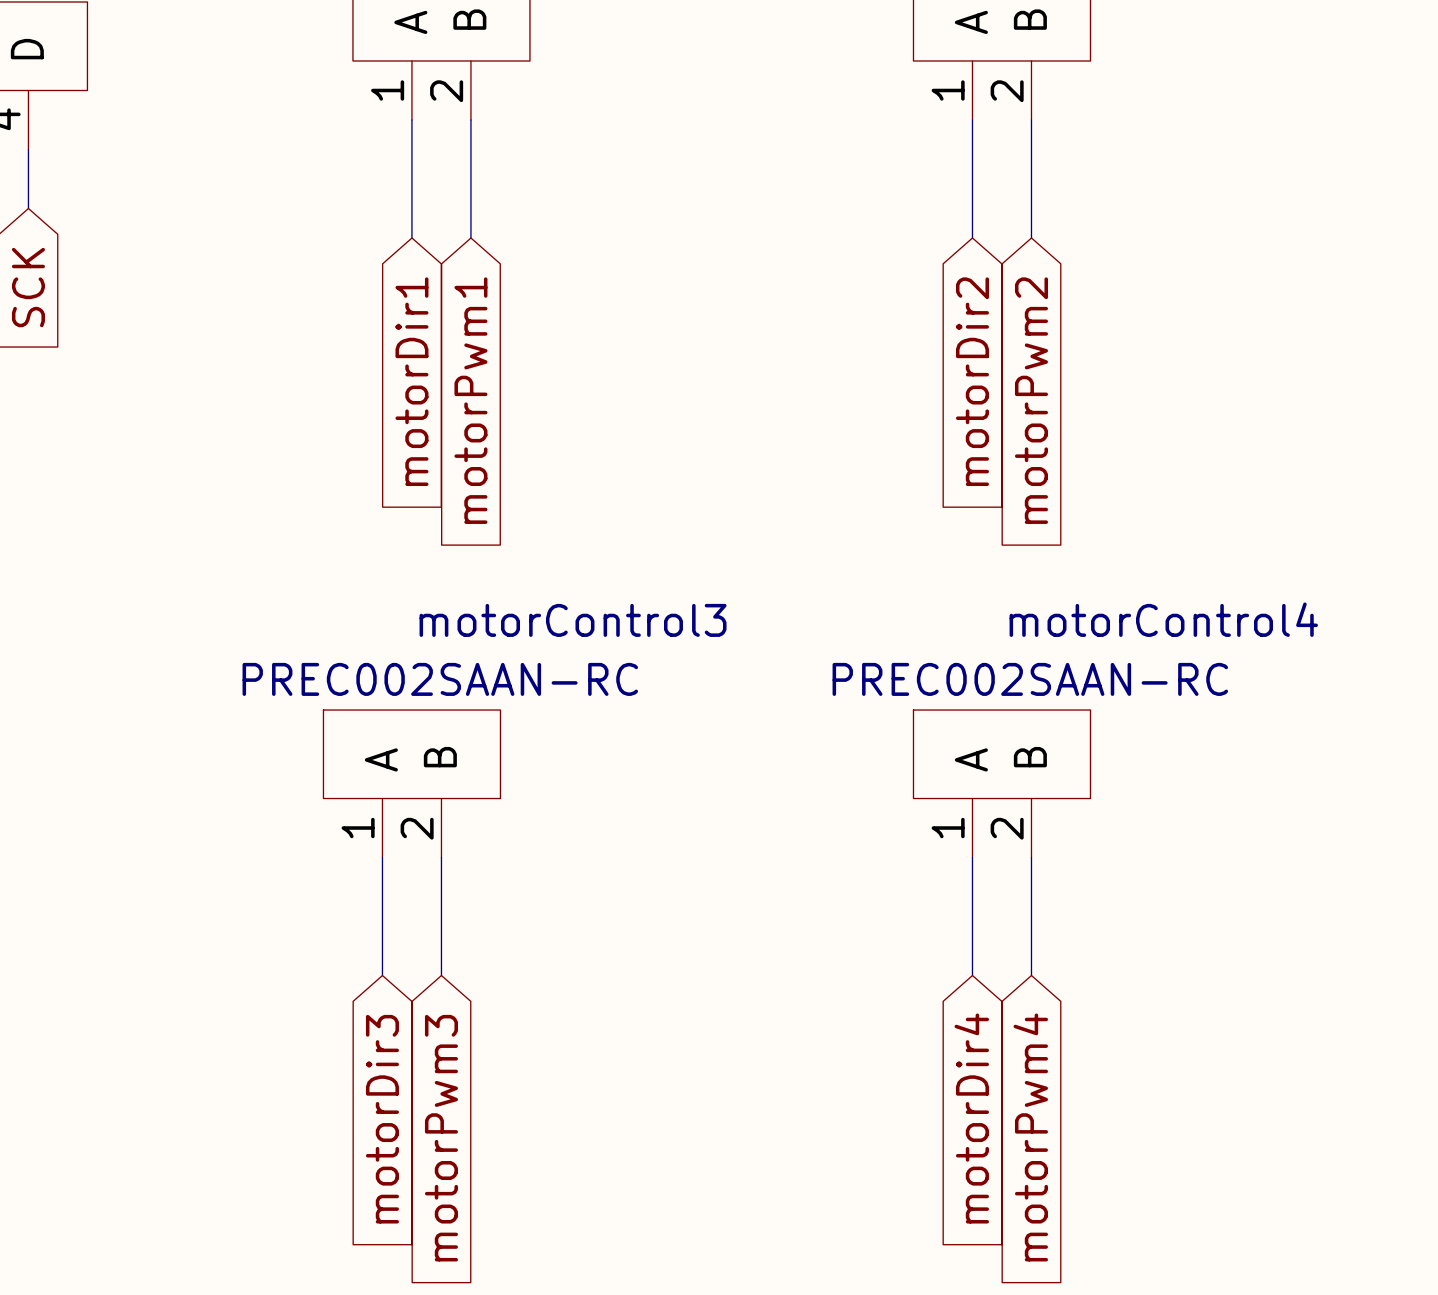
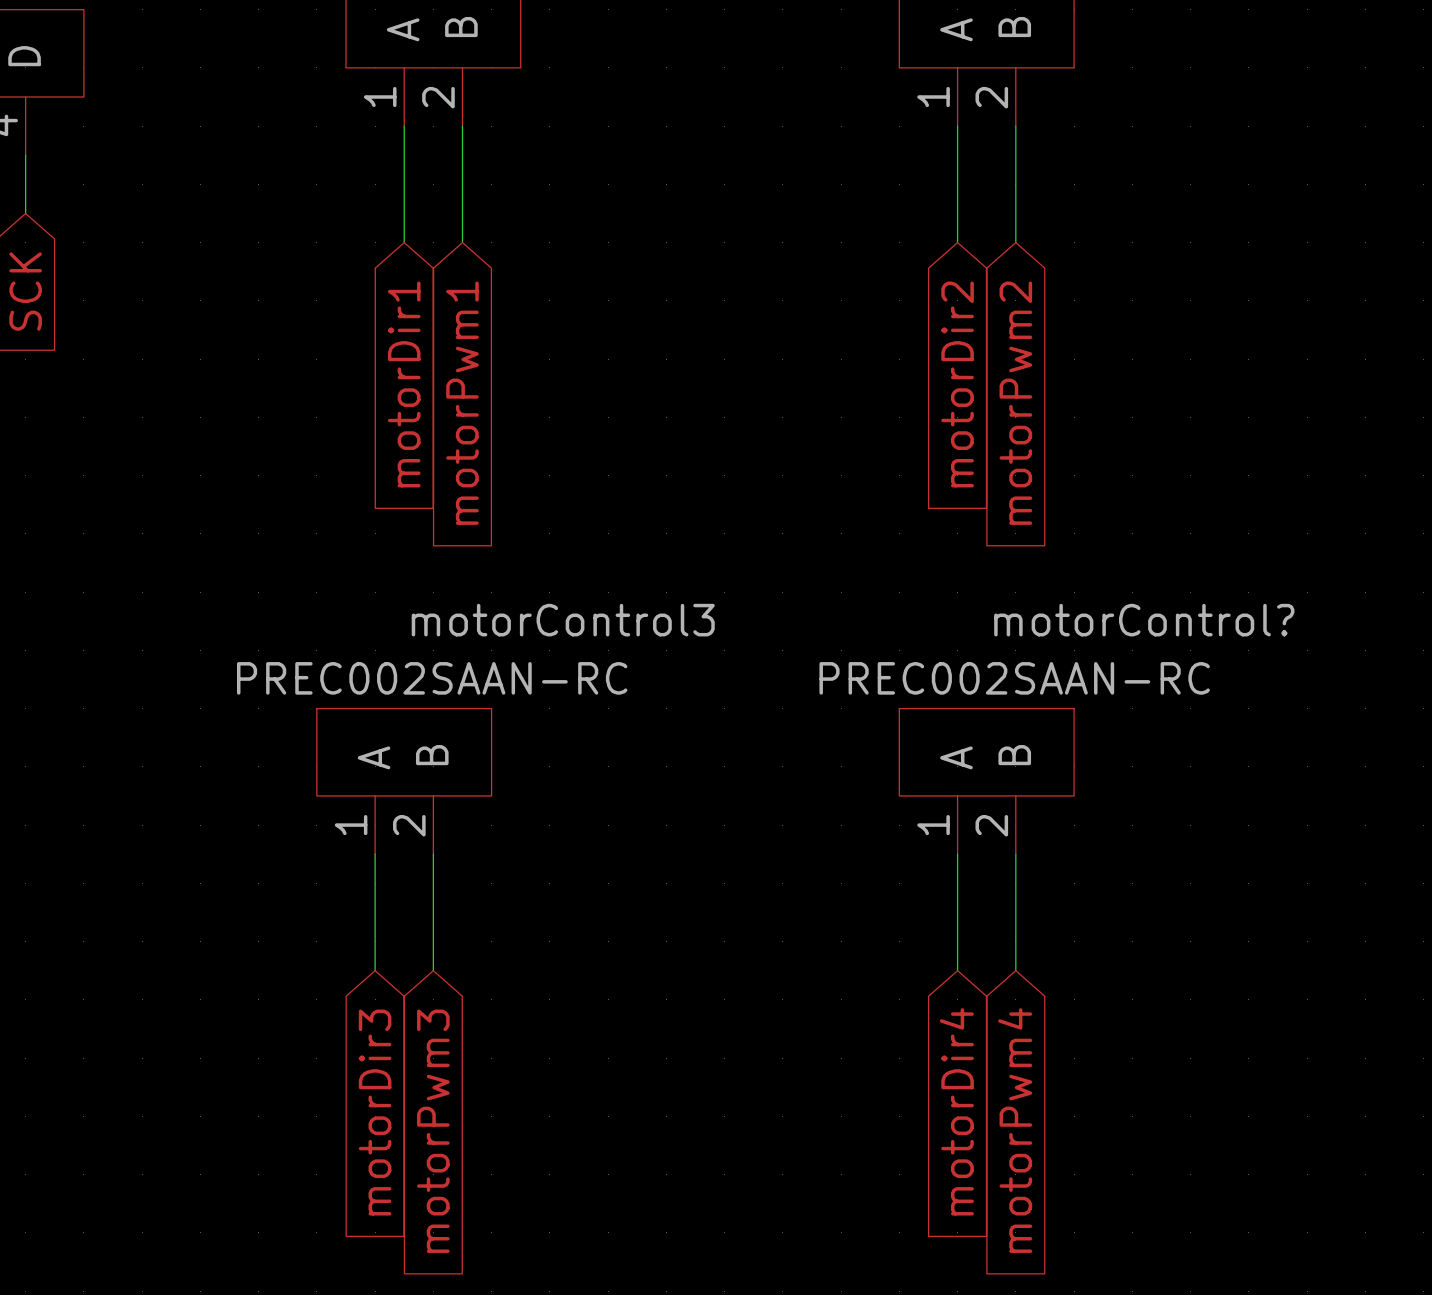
motorControl4 name: motorControl4 (1163, 619) -> motorControl? (1144, 620)

